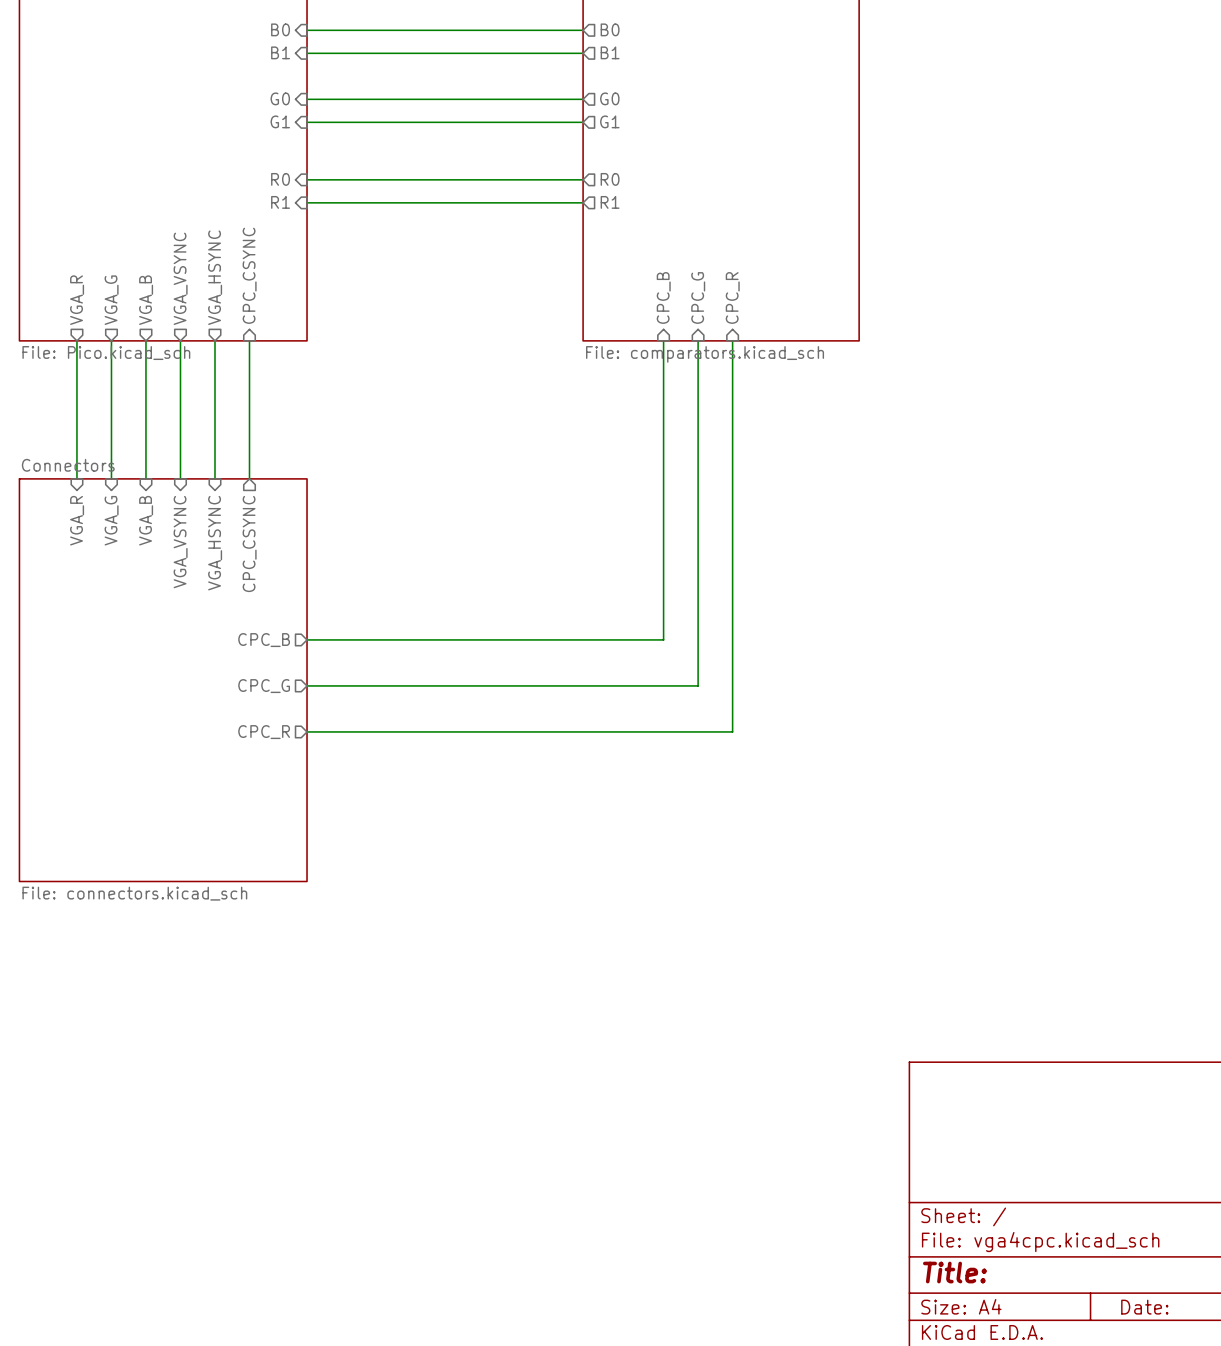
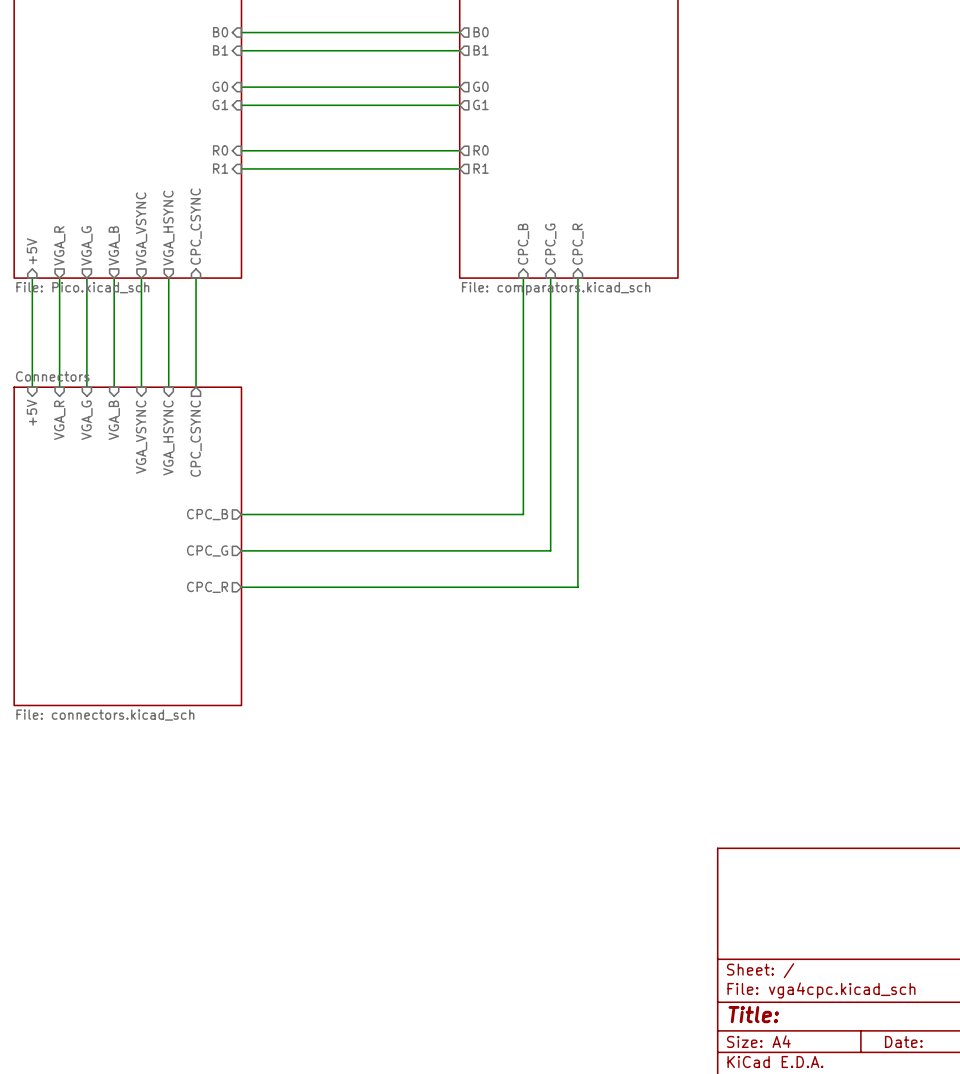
sheet pin: none -> +5V (32, 251)
wire: none -> (32, 278) (32, 387)
sheet pin: none -> +5V (32, 412)

